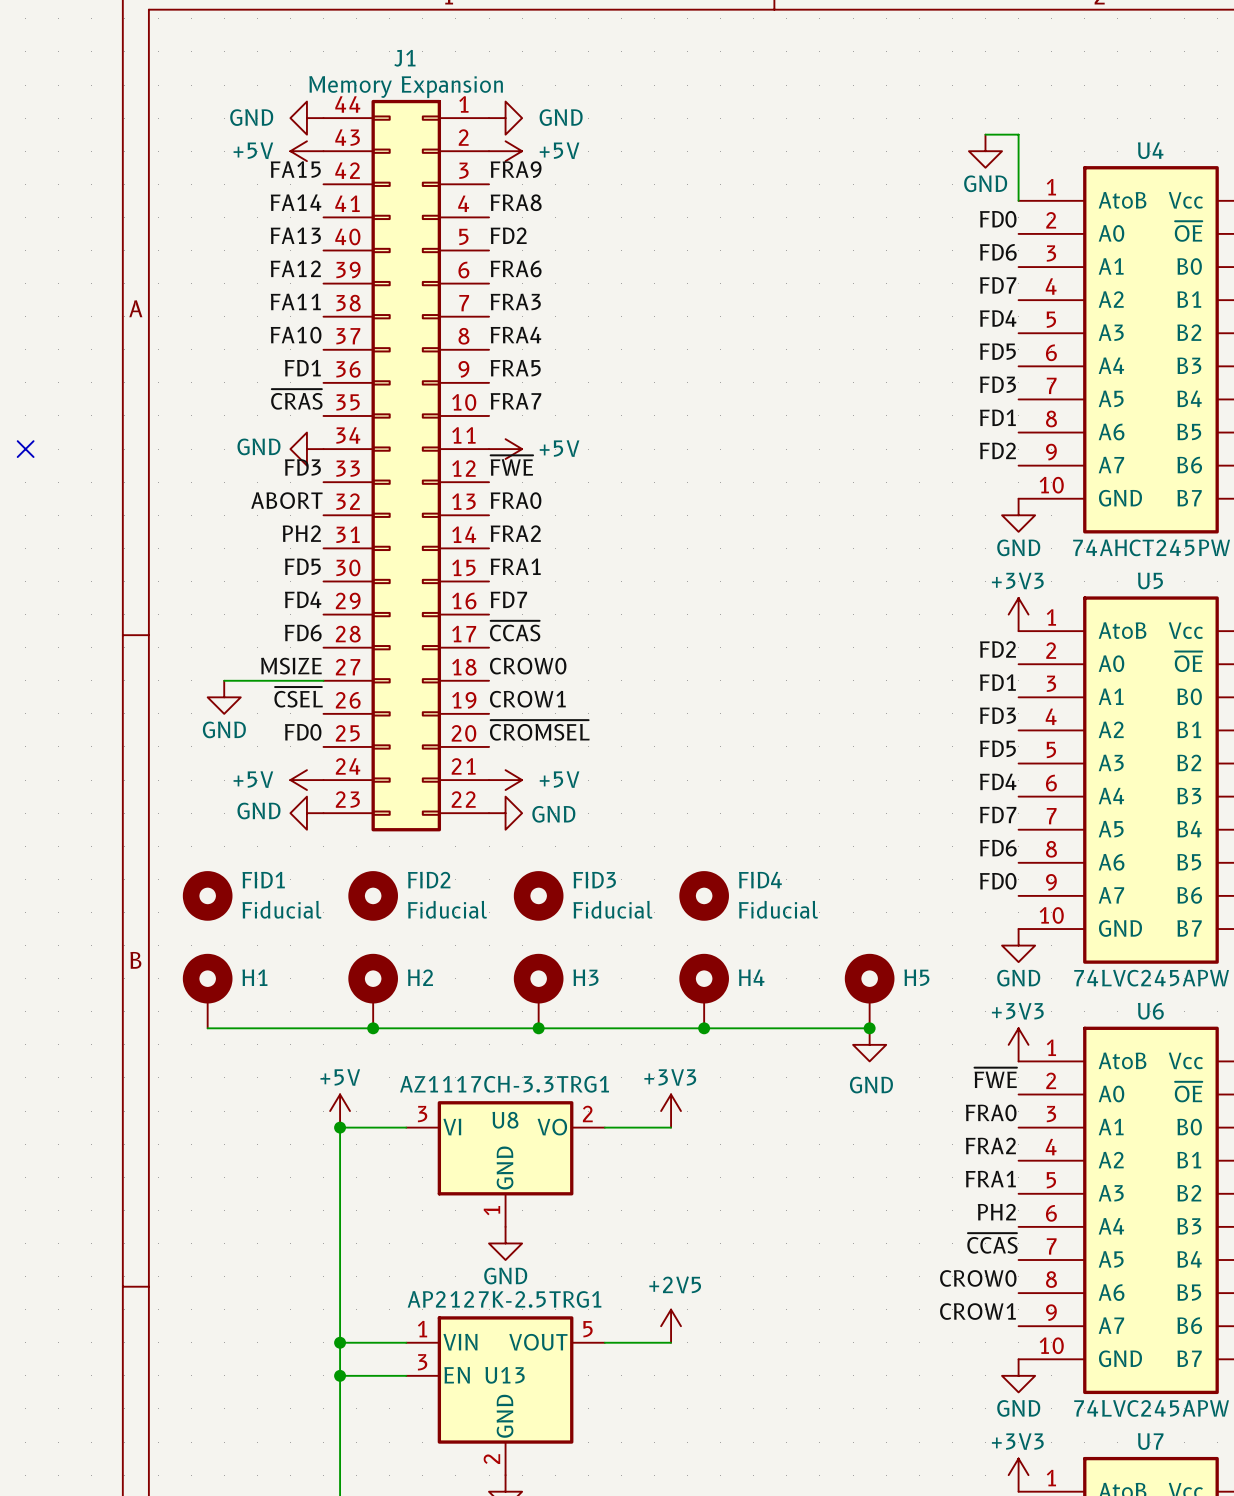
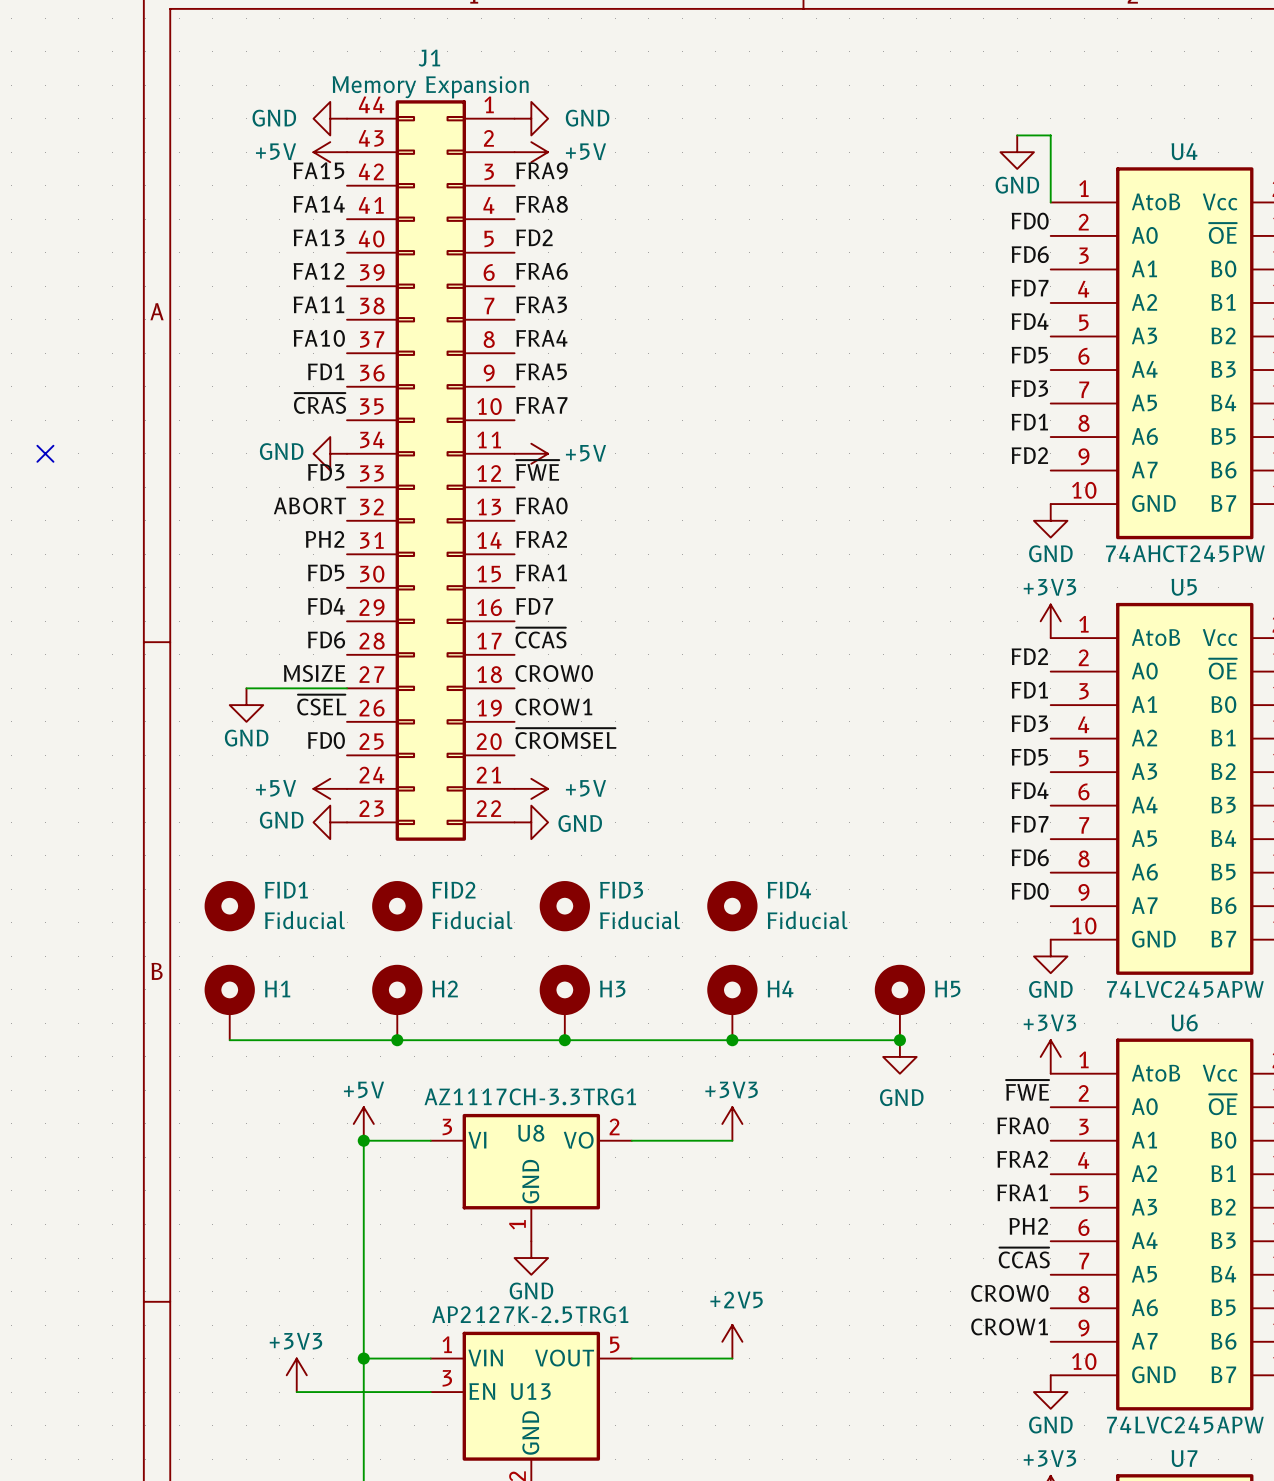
power symbol position: +3V3 (671, 1111) -> +3V3 (732, 1123)
wire: none -> (698, 1140) (732, 1140)
power symbol position: +2V5 (671, 1326) -> +2V5 (732, 1341)
wire: none -> (698, 1358) (732, 1358)
power symbol: none -> +3V3 (296, 1375)
wire: none -> (296, 1392) (363, 1392)
junction: (340, 1375) -> none

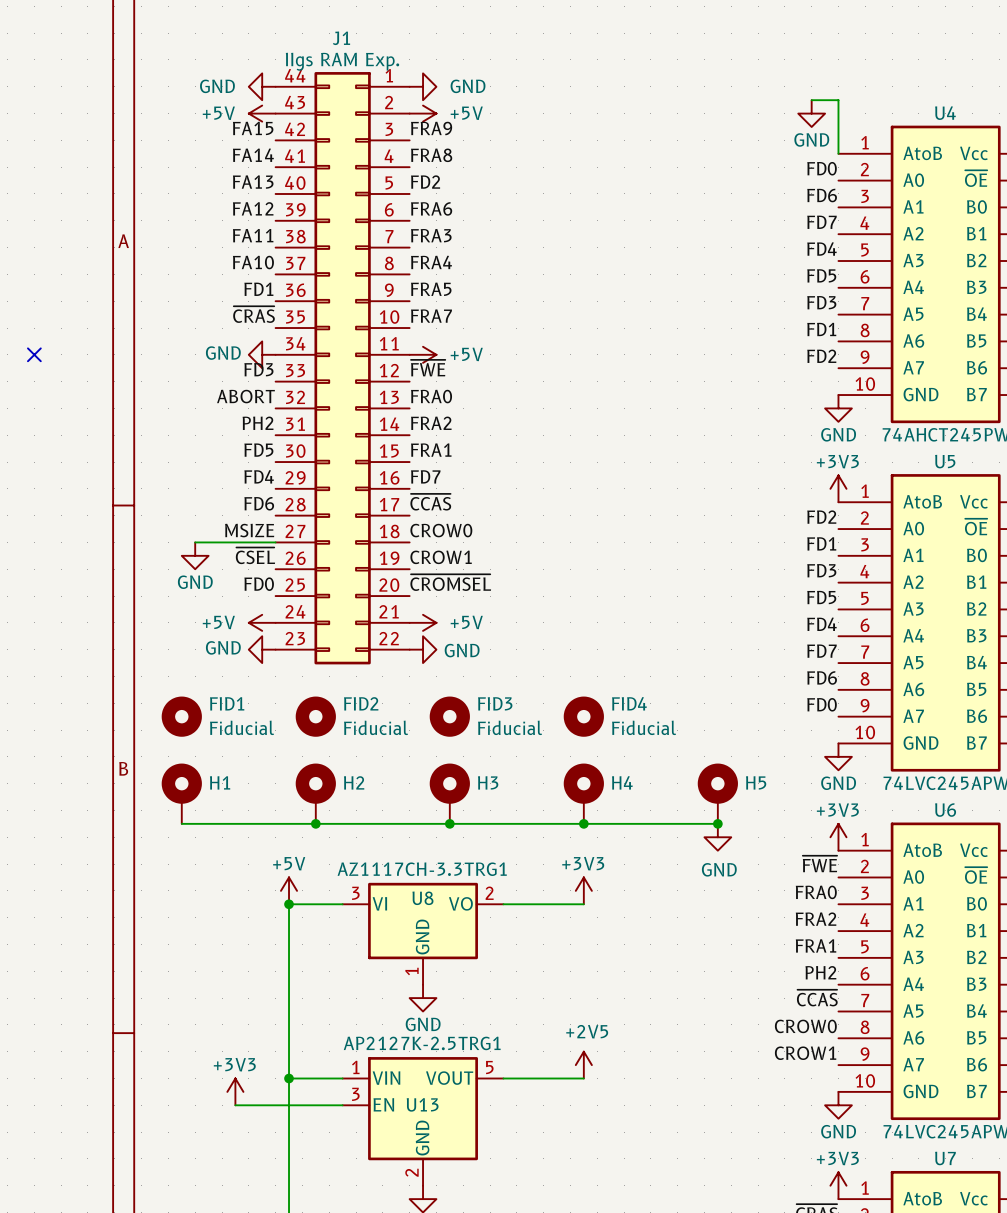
J1 value: Memory Expansion (430, 87) -> IIgs RAM Exp. (342, 61)

